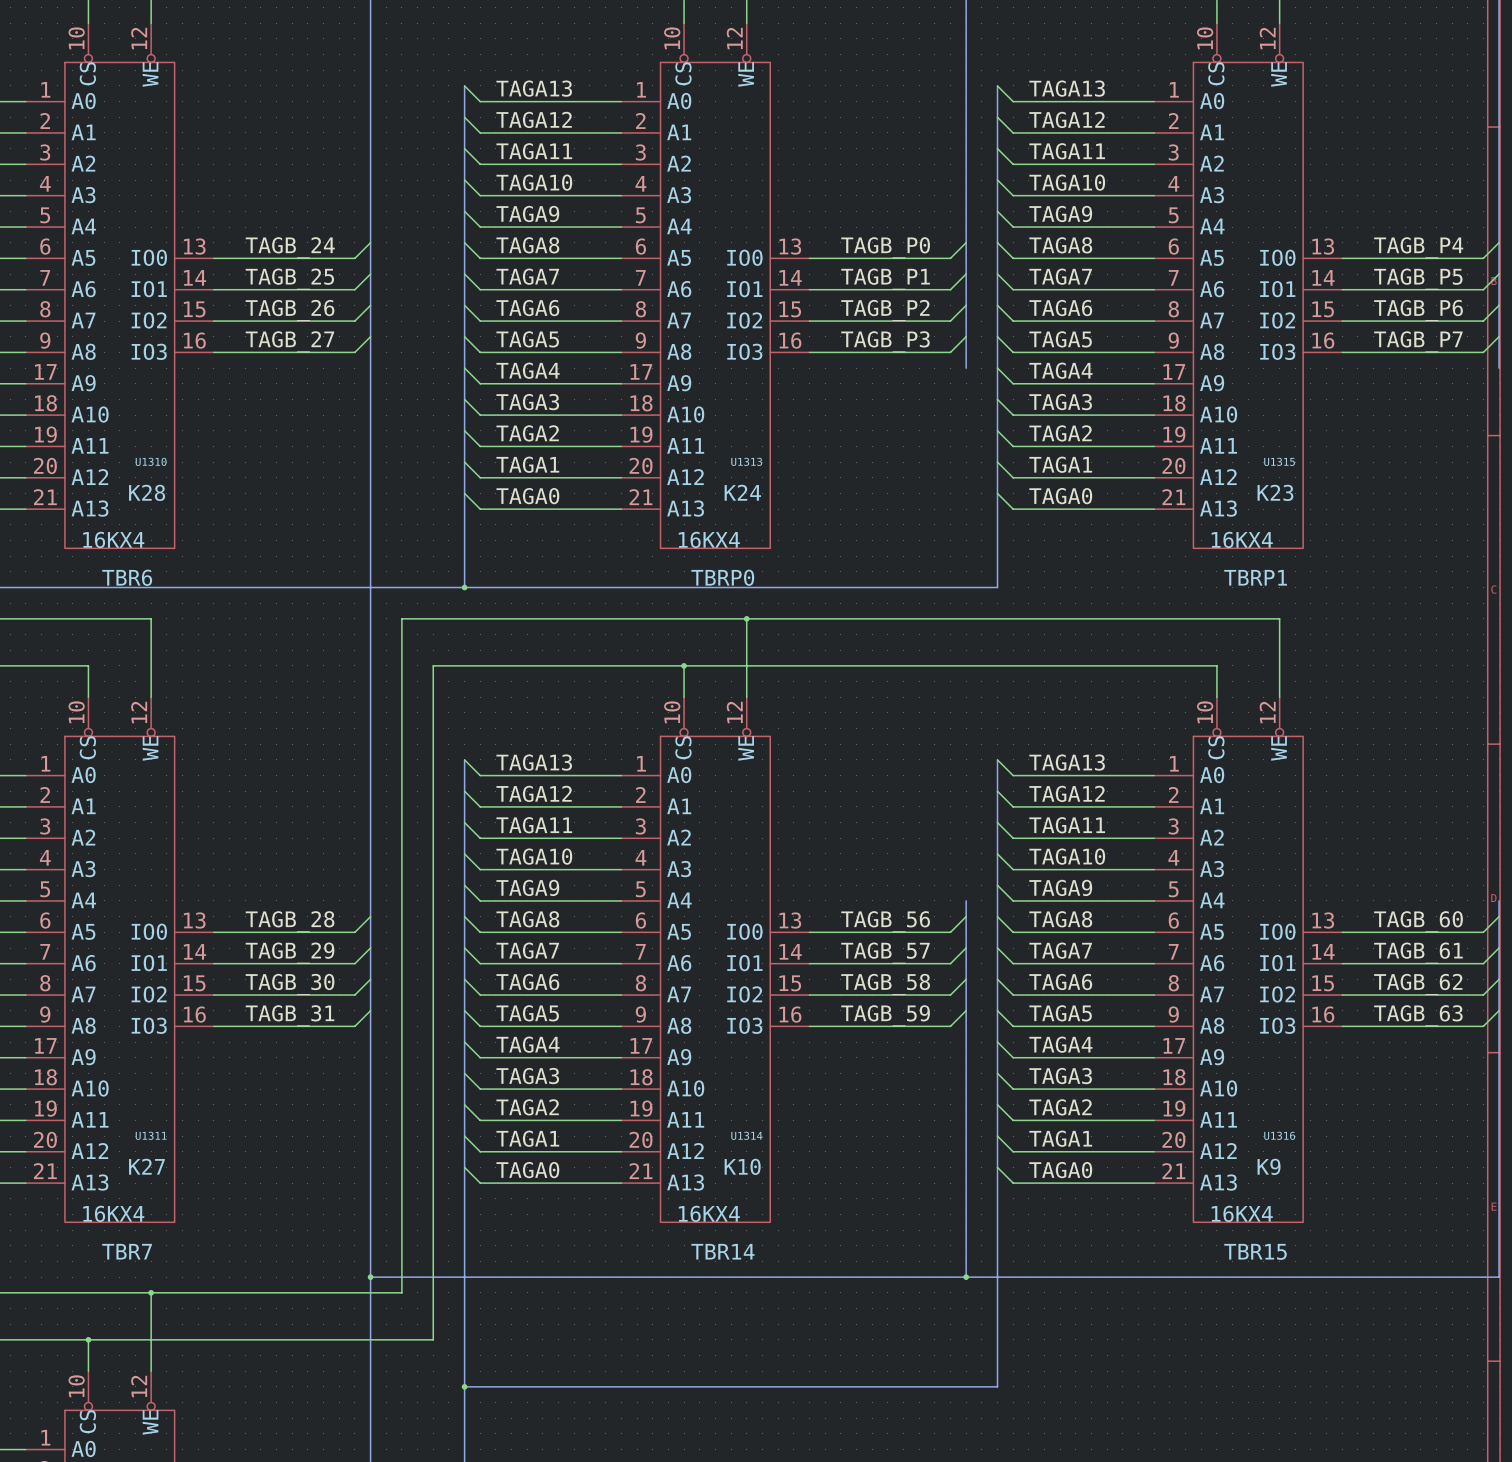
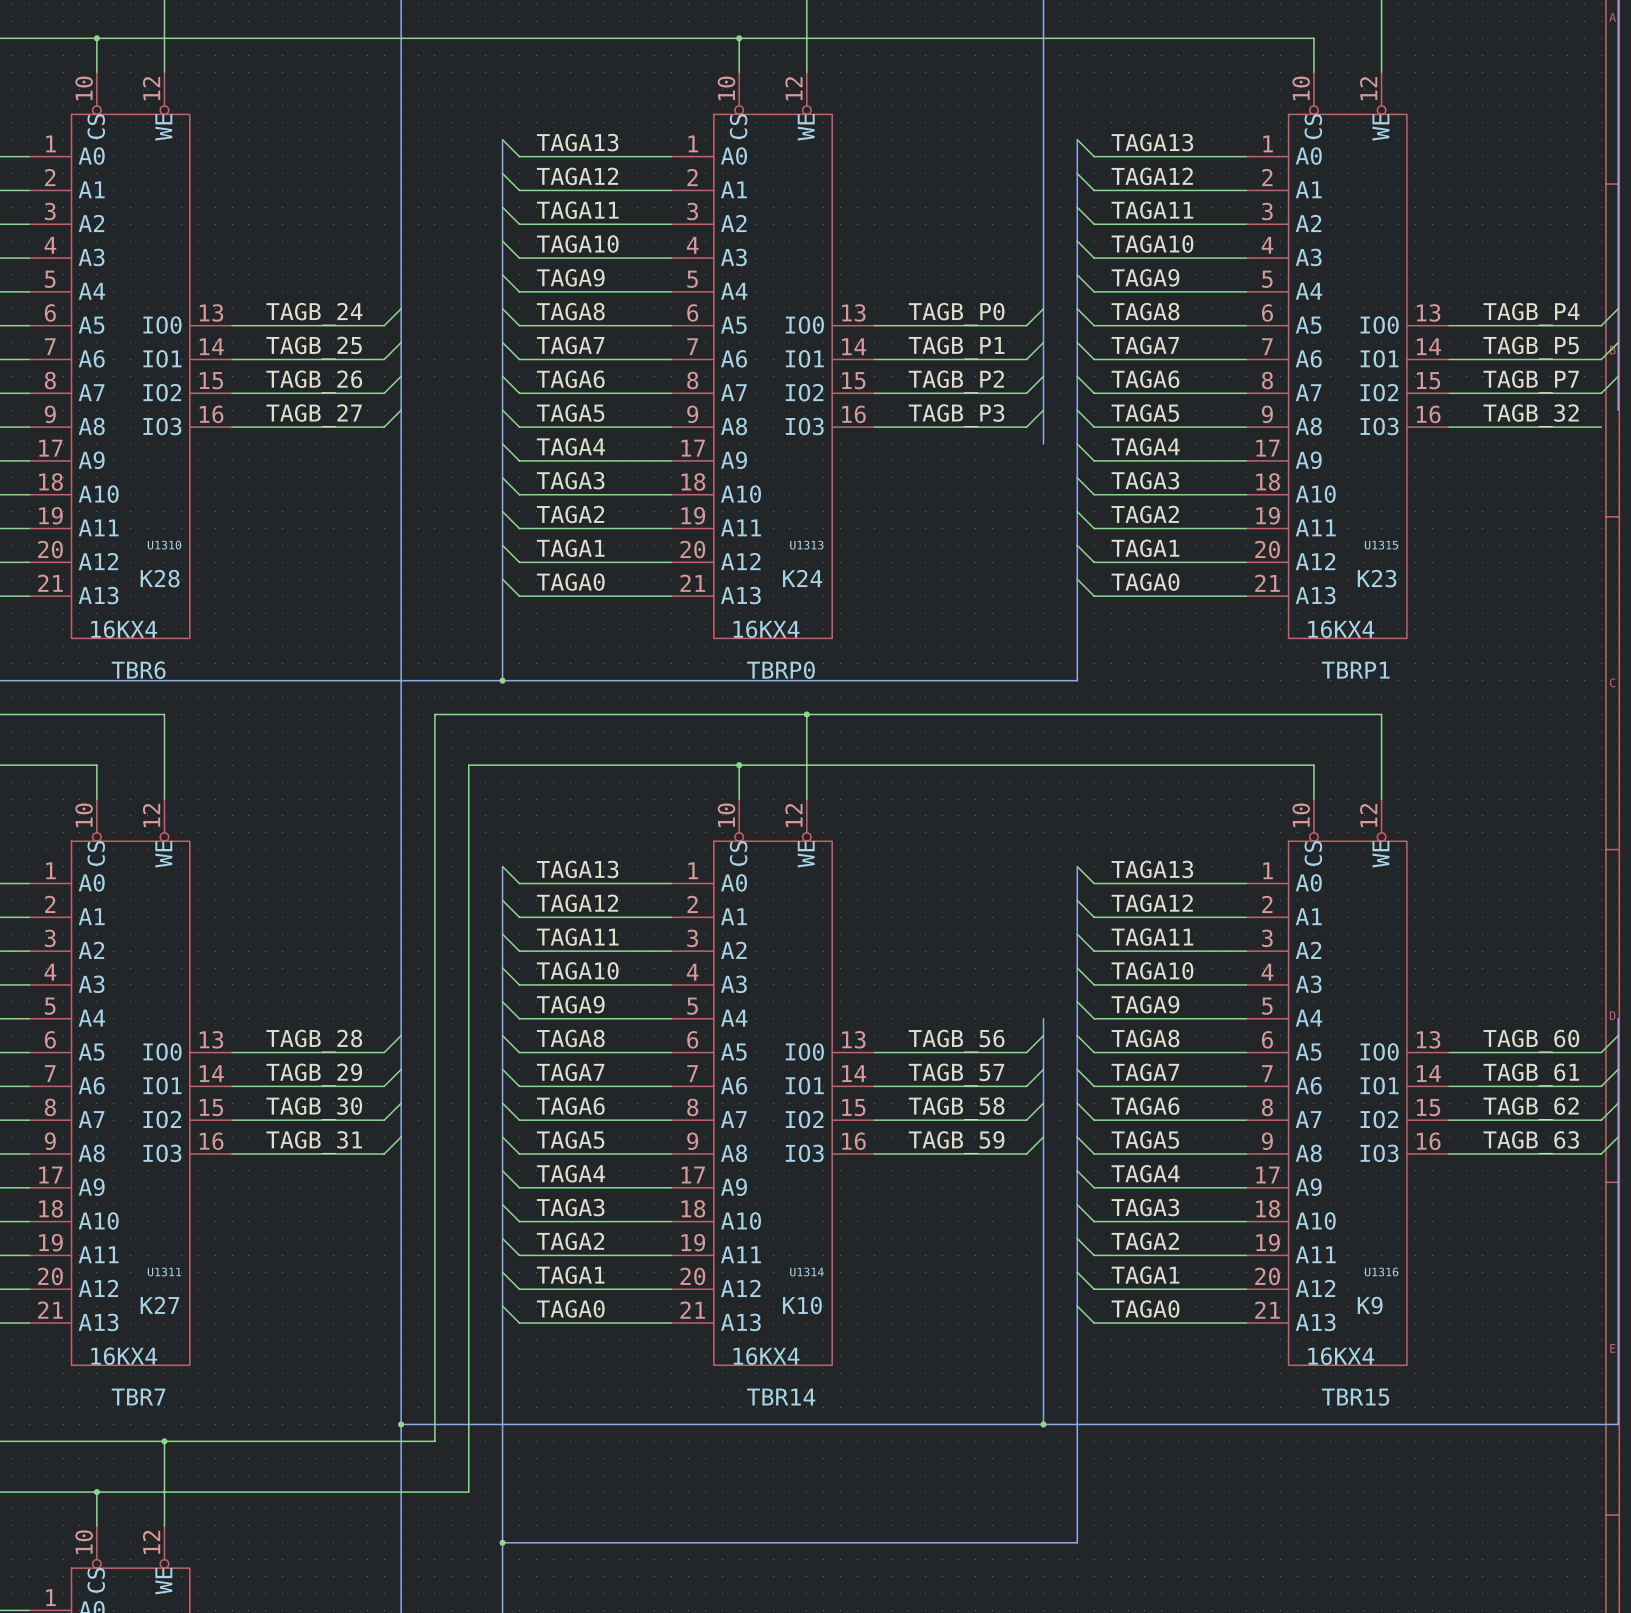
label: TAGB_P6 (1418, 310) -> TAGB_P7 (1531, 381)
bus: (1499, 336) (1499, 368) -> none
wire: (1499, 336) (1483, 352) -> none
label: TAGB_P7 (1418, 341) -> TAGB_32 (1531, 415)

